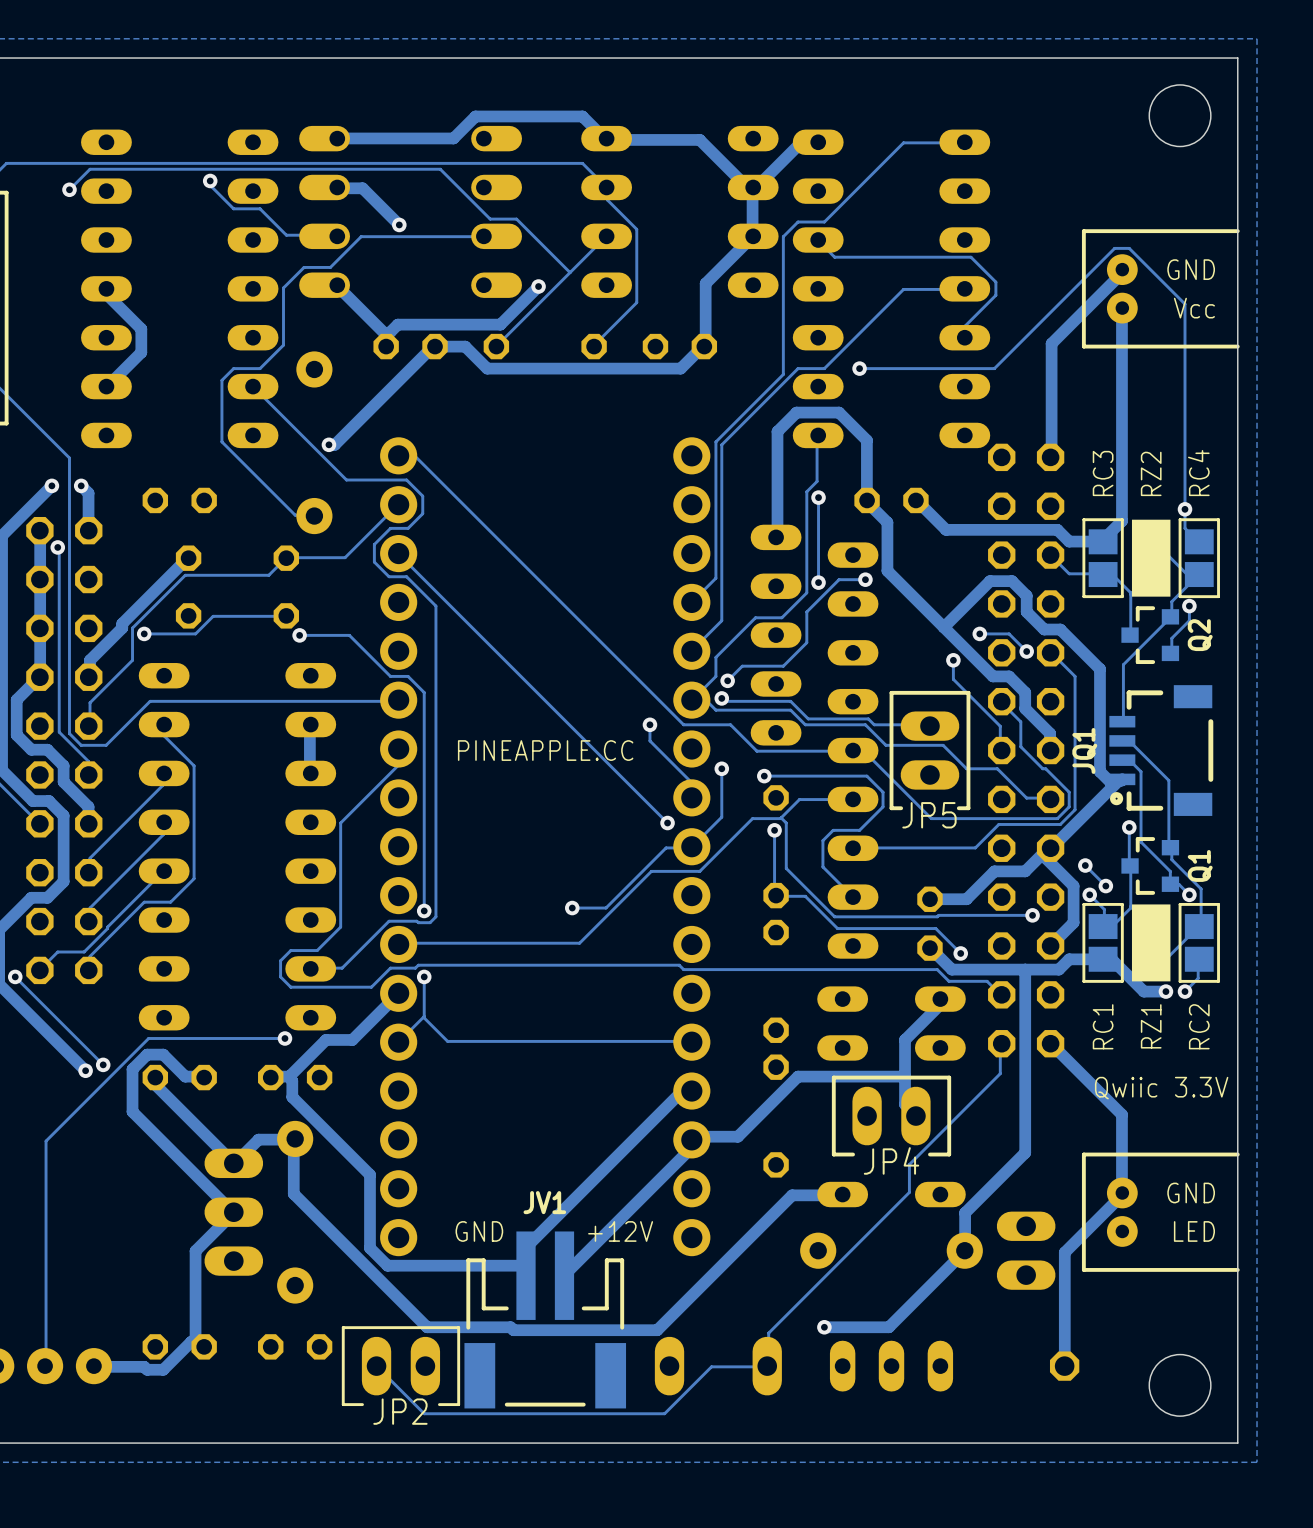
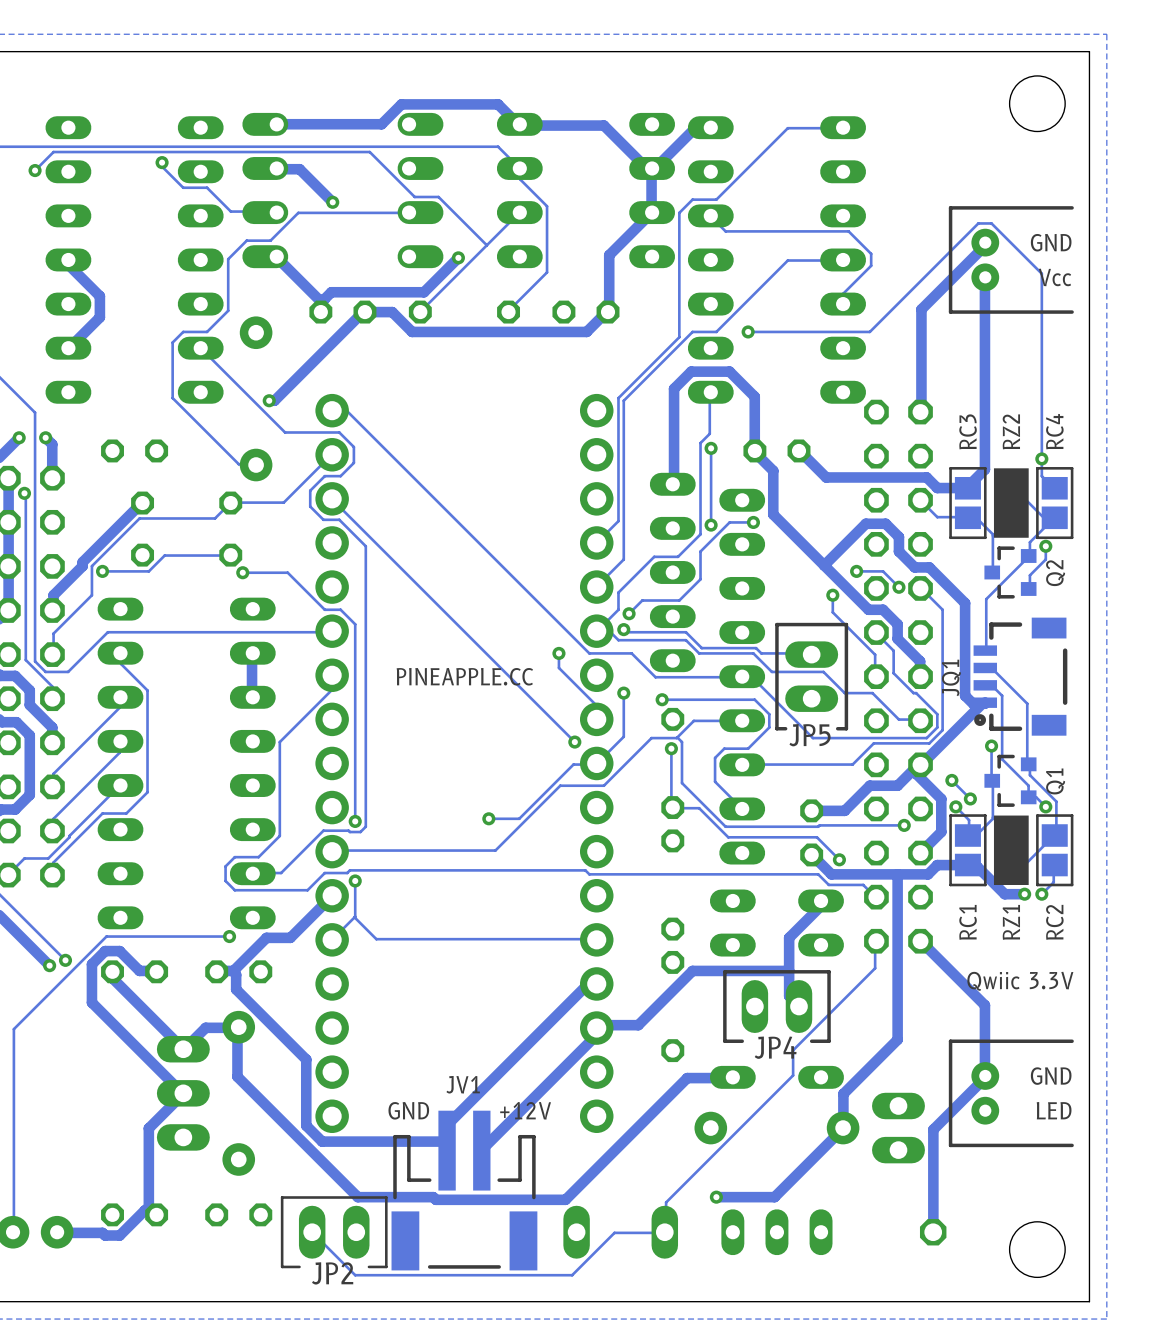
line: (1237, 231) (1218, 231) -> none
line: (1237, 346) (1218, 346) -> none
line: (1237, 1154) (1218, 1154) -> none
line: (1237, 1269) (1218, 1269) -> none

